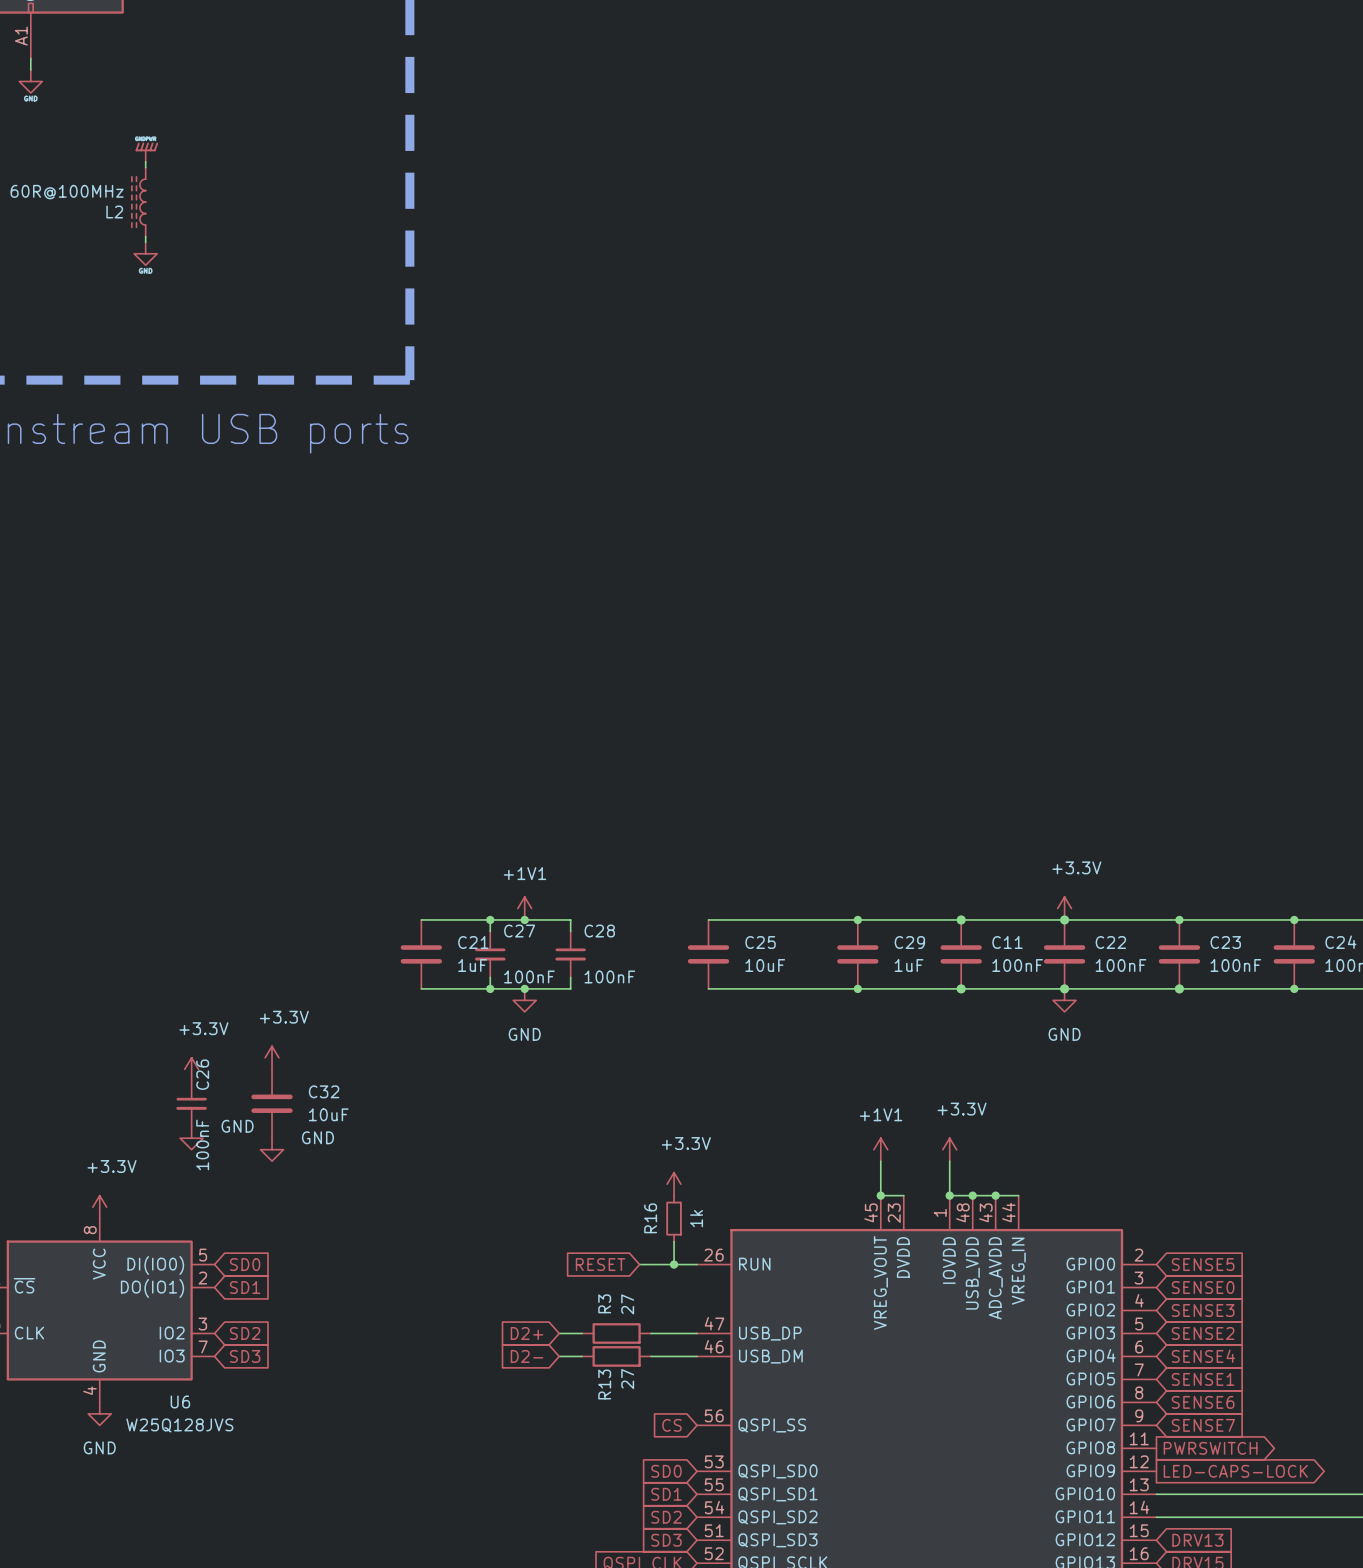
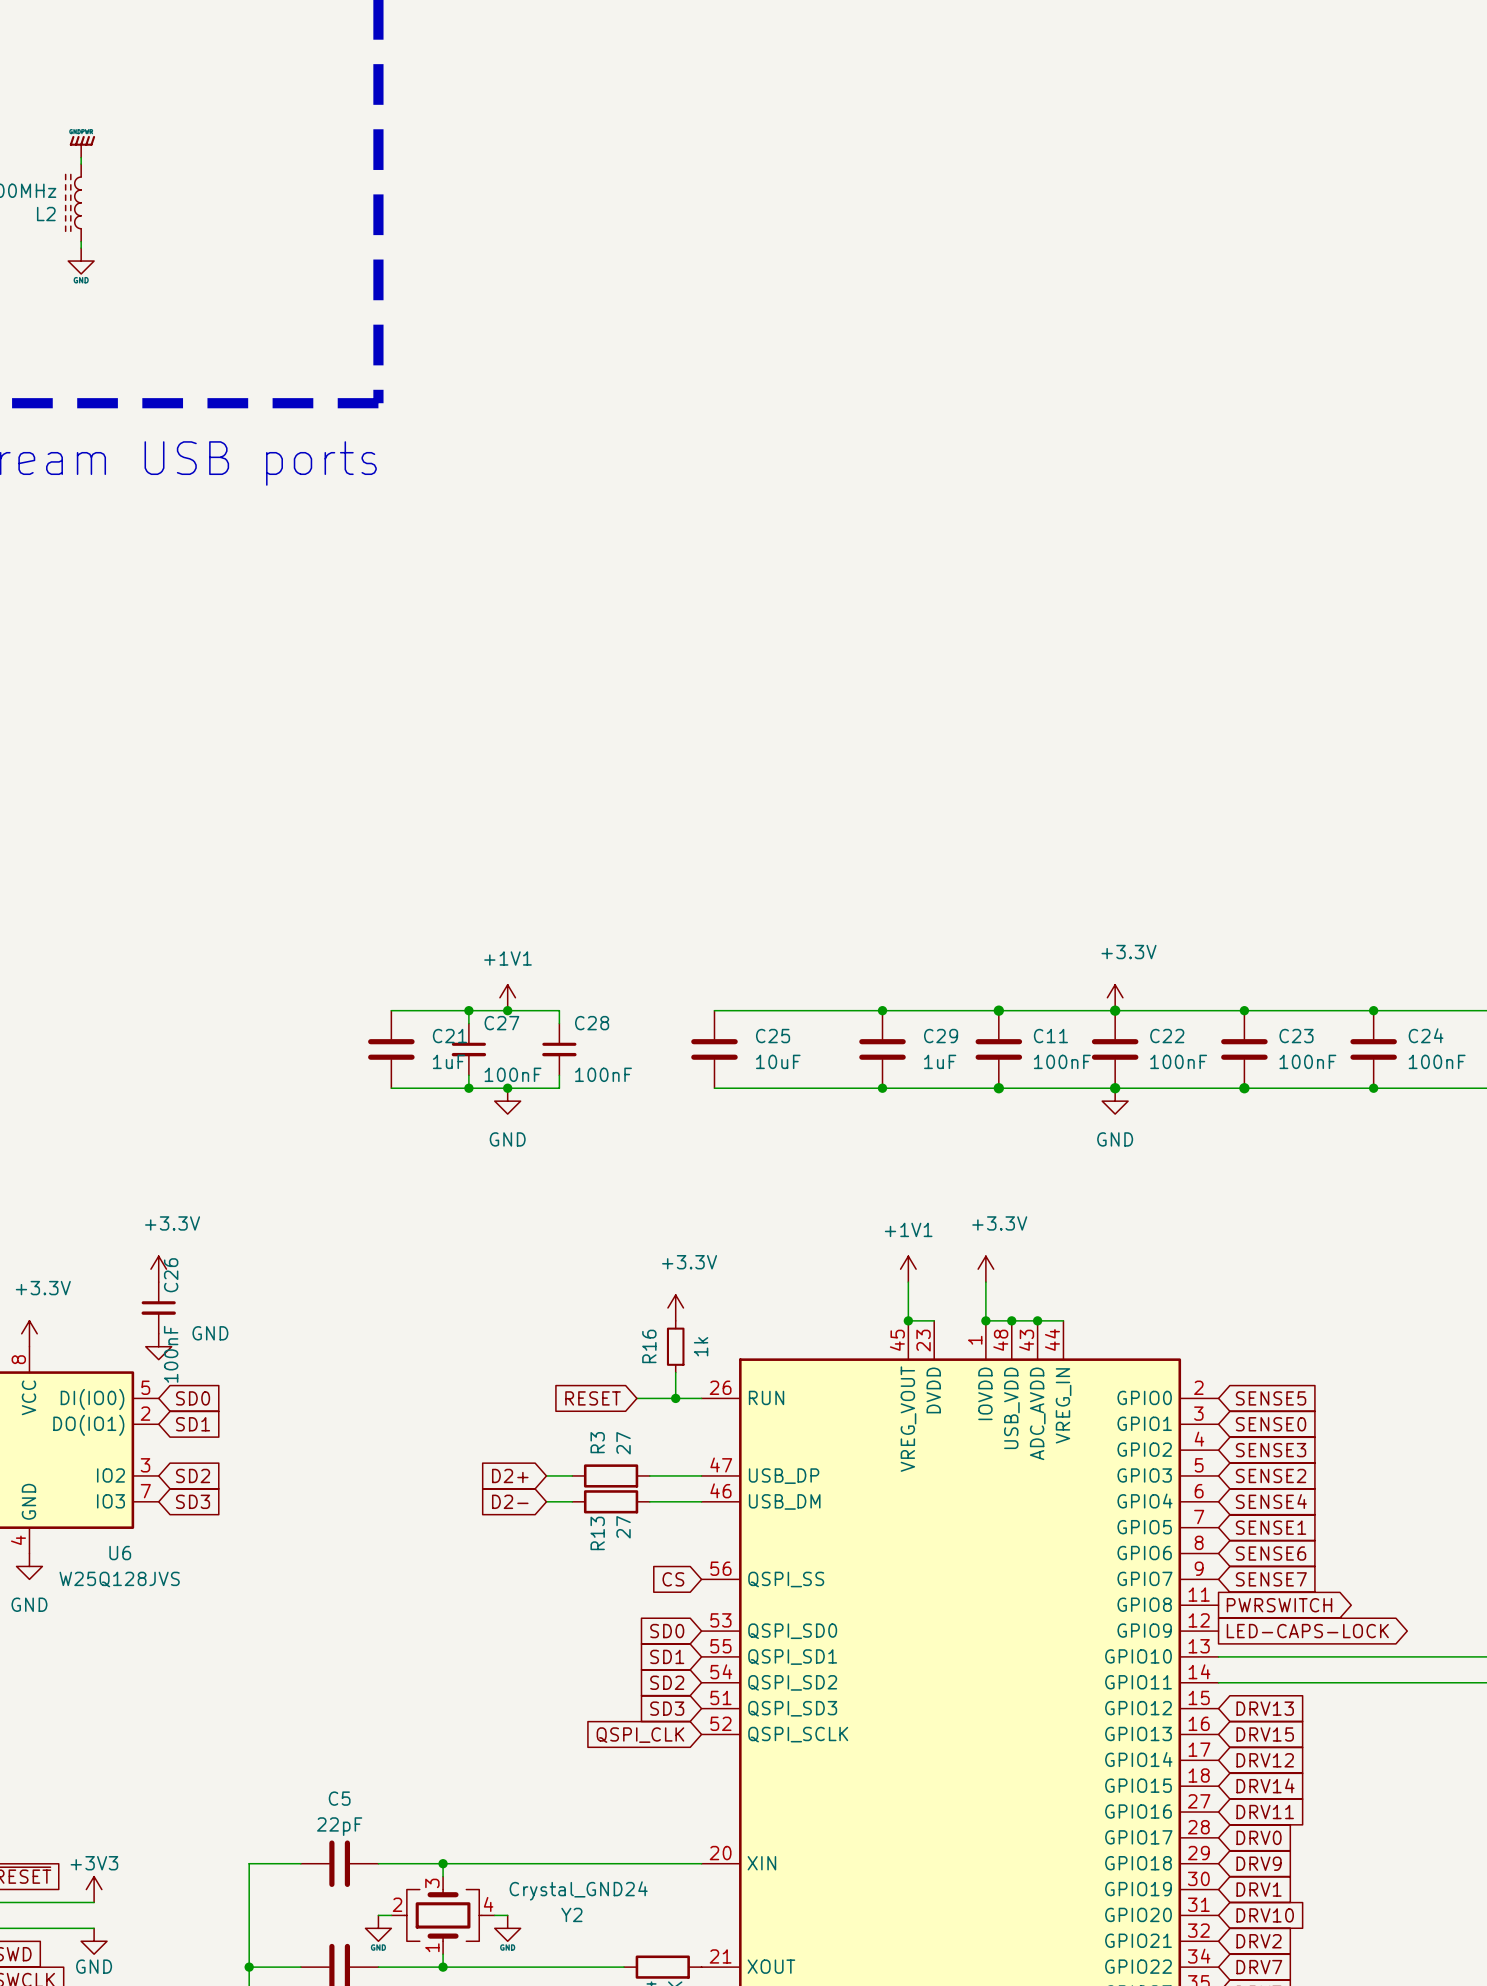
power symbol: +3.3V (272, 1057) -> none
power symbol: +3.3V (191, 1069) -> none
C26 position: (191, 1103) -> (158, 1307)
C32: 10uF (272, 1103) -> none
power symbol: GND (191, 1138) -> none
power symbol: none -> +3.3V (158, 1269)
power symbol: GND (272, 1149) -> none
power symbol: none -> GND (158, 1346)

